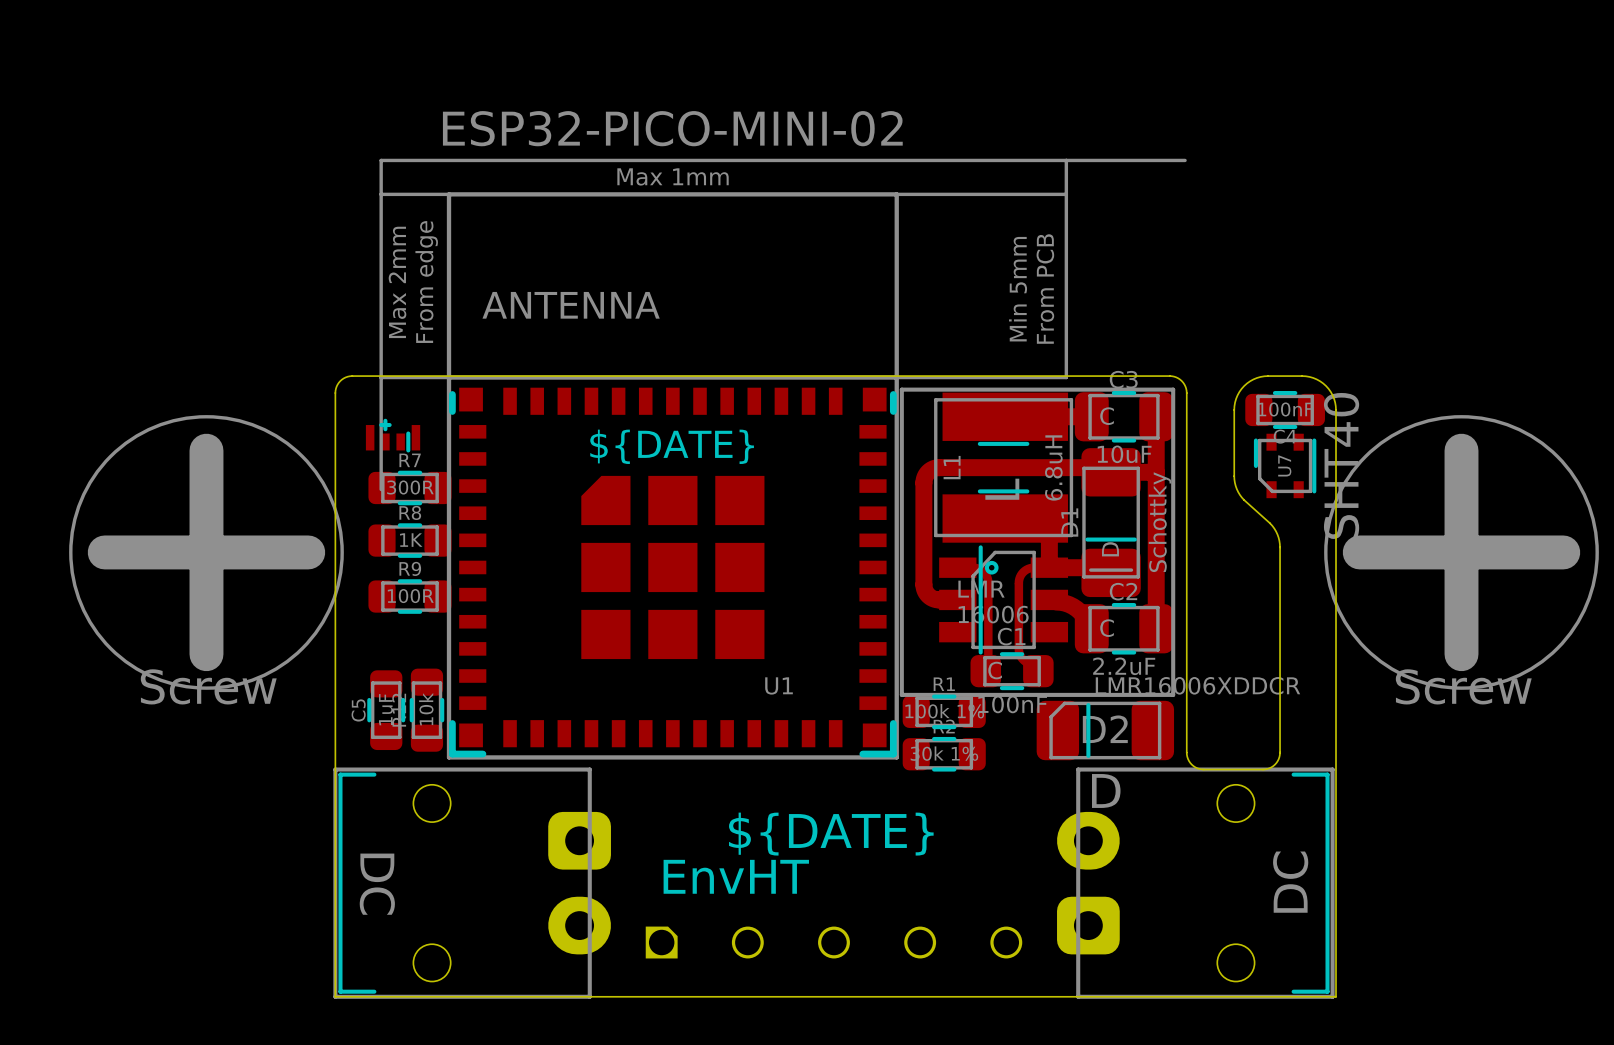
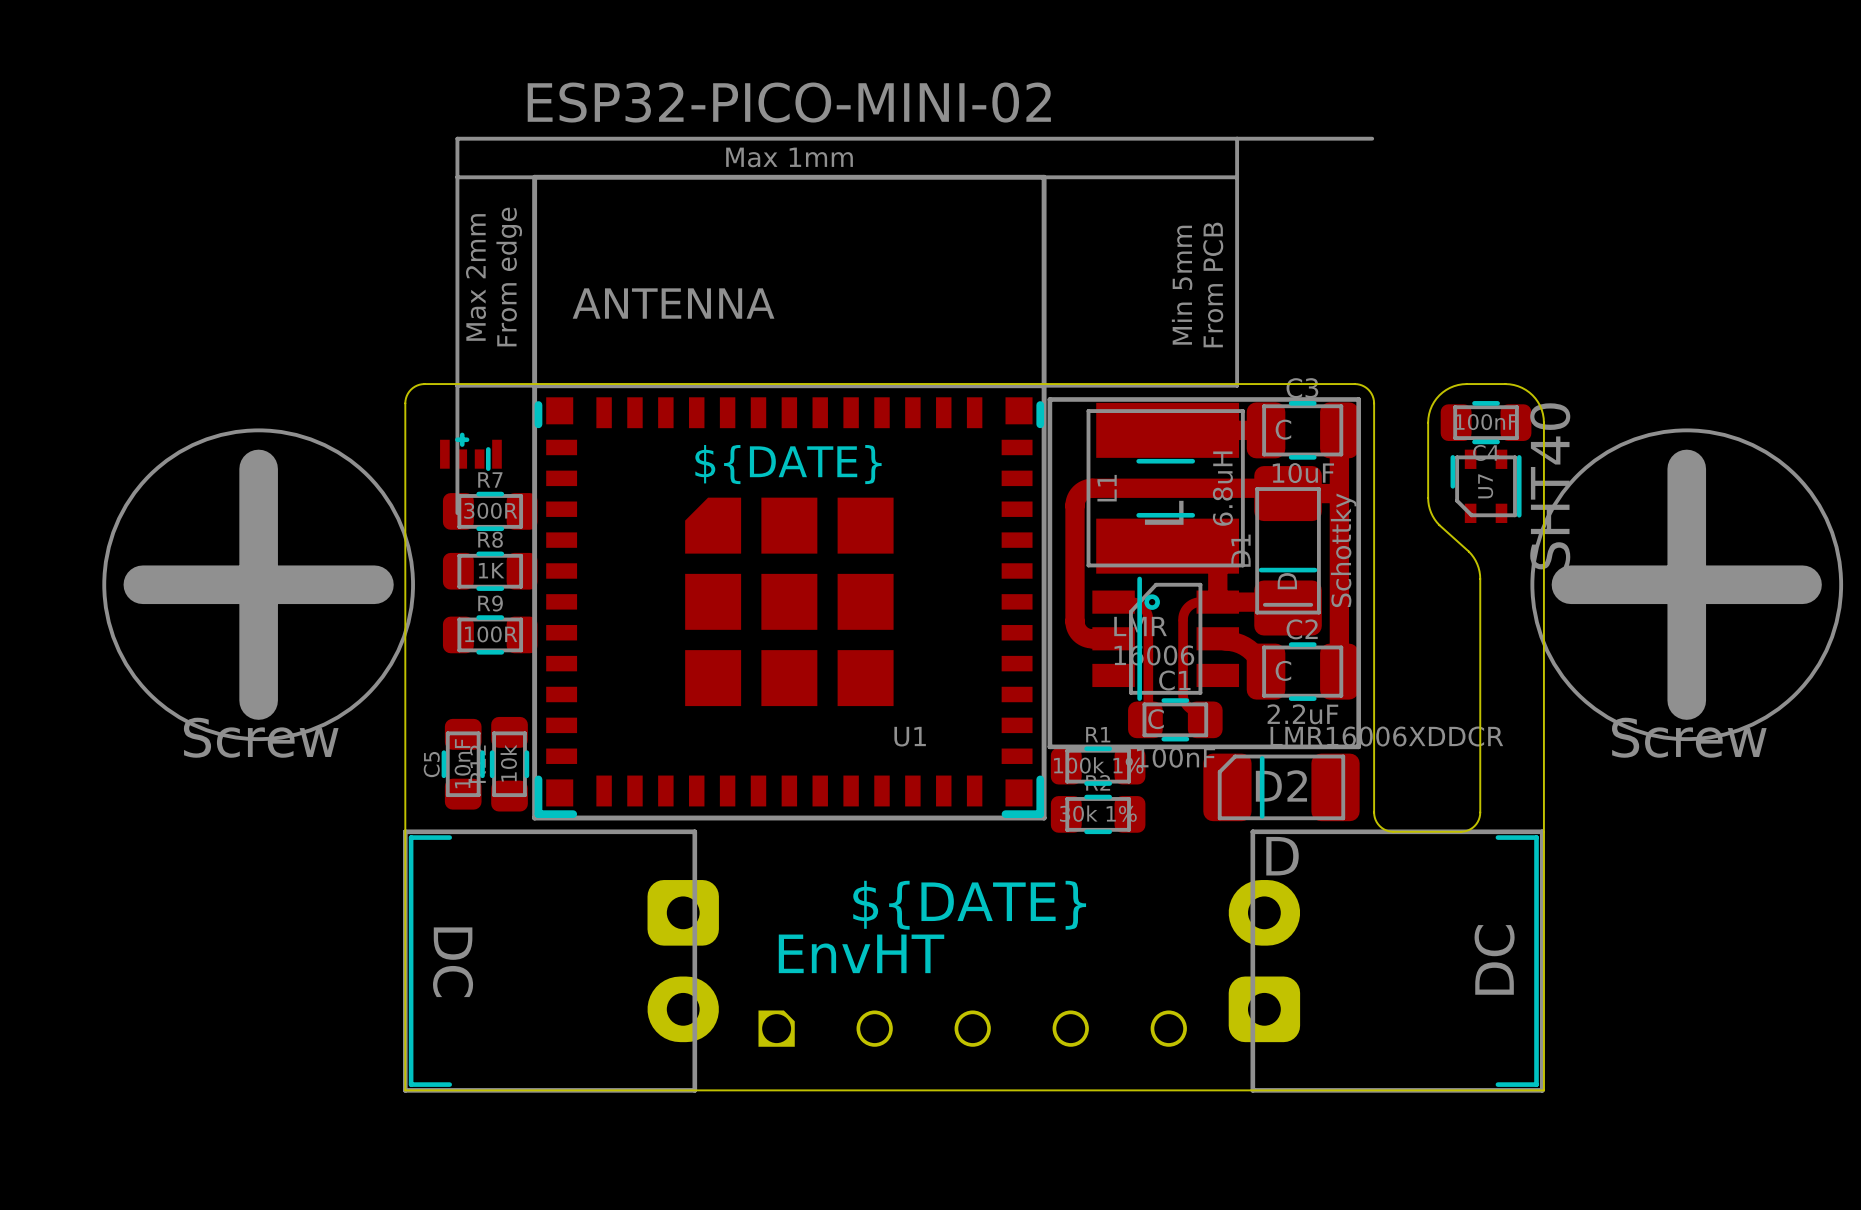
C5 value: 1uF (385, 709) -> 10nF (462, 763)
part footprint: [333, 767, 611, 999] -> [403, 829, 719, 1093]
part footprint: [1057, 767, 1335, 999] -> [1228, 829, 1545, 1093]

